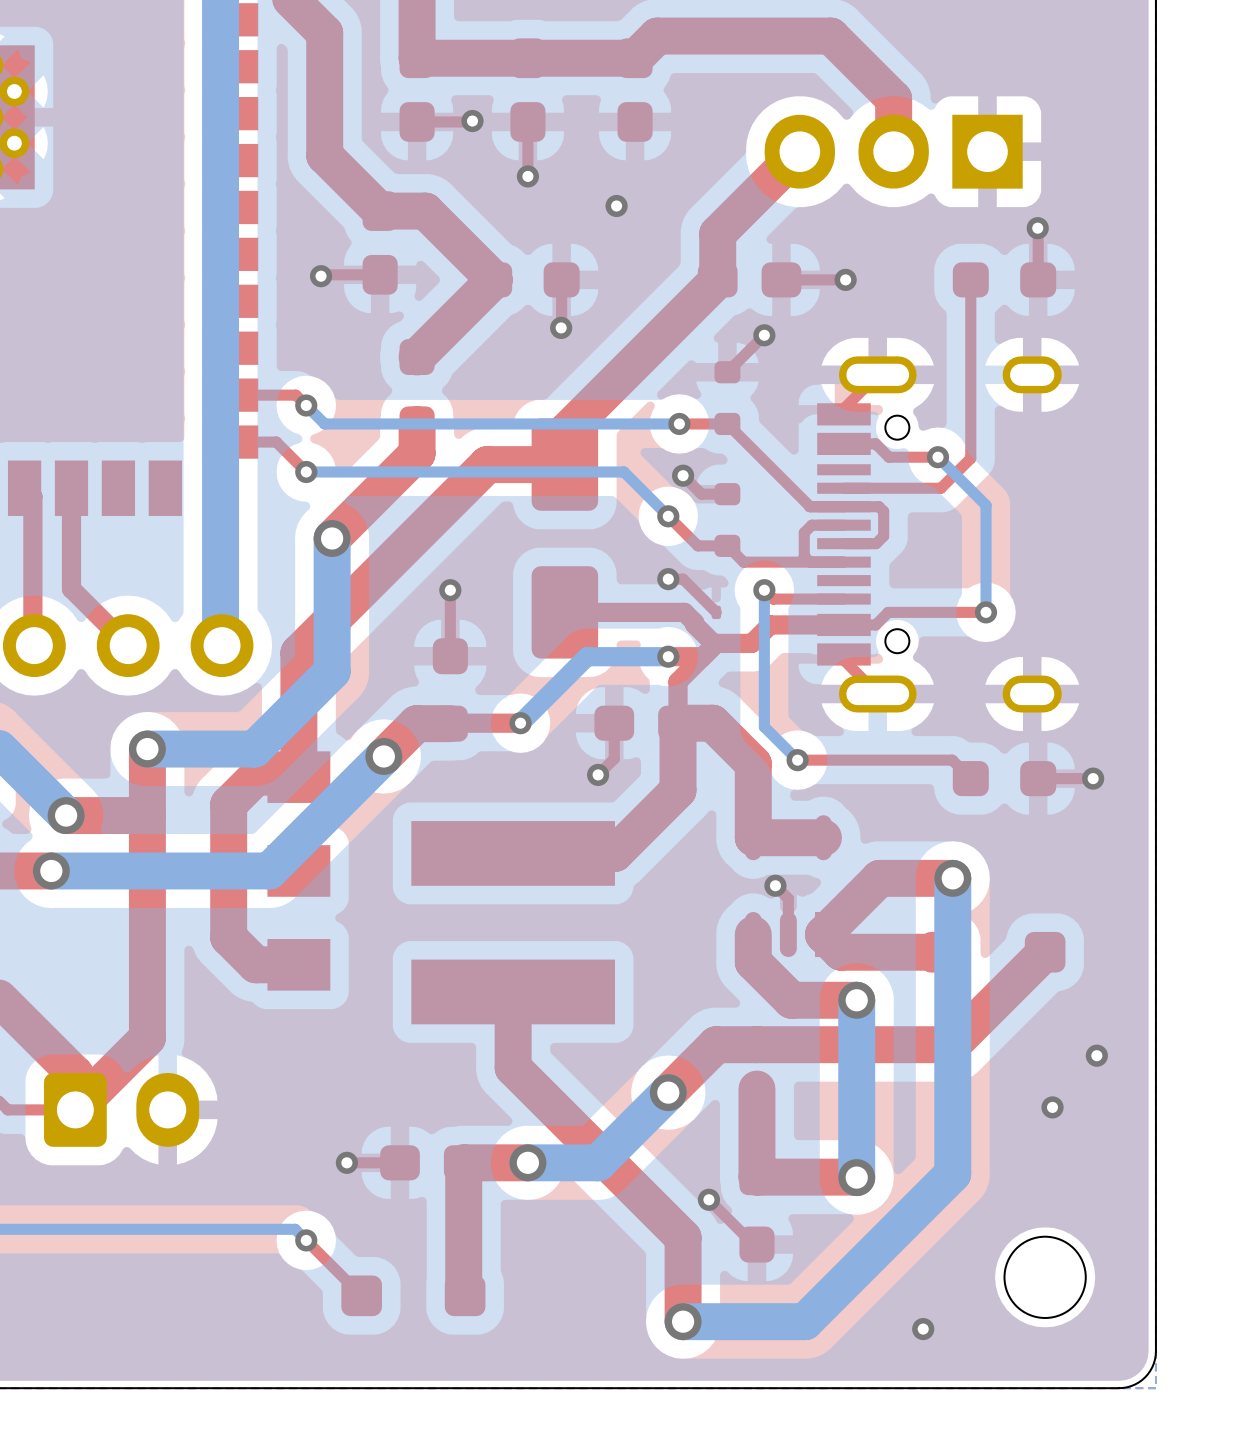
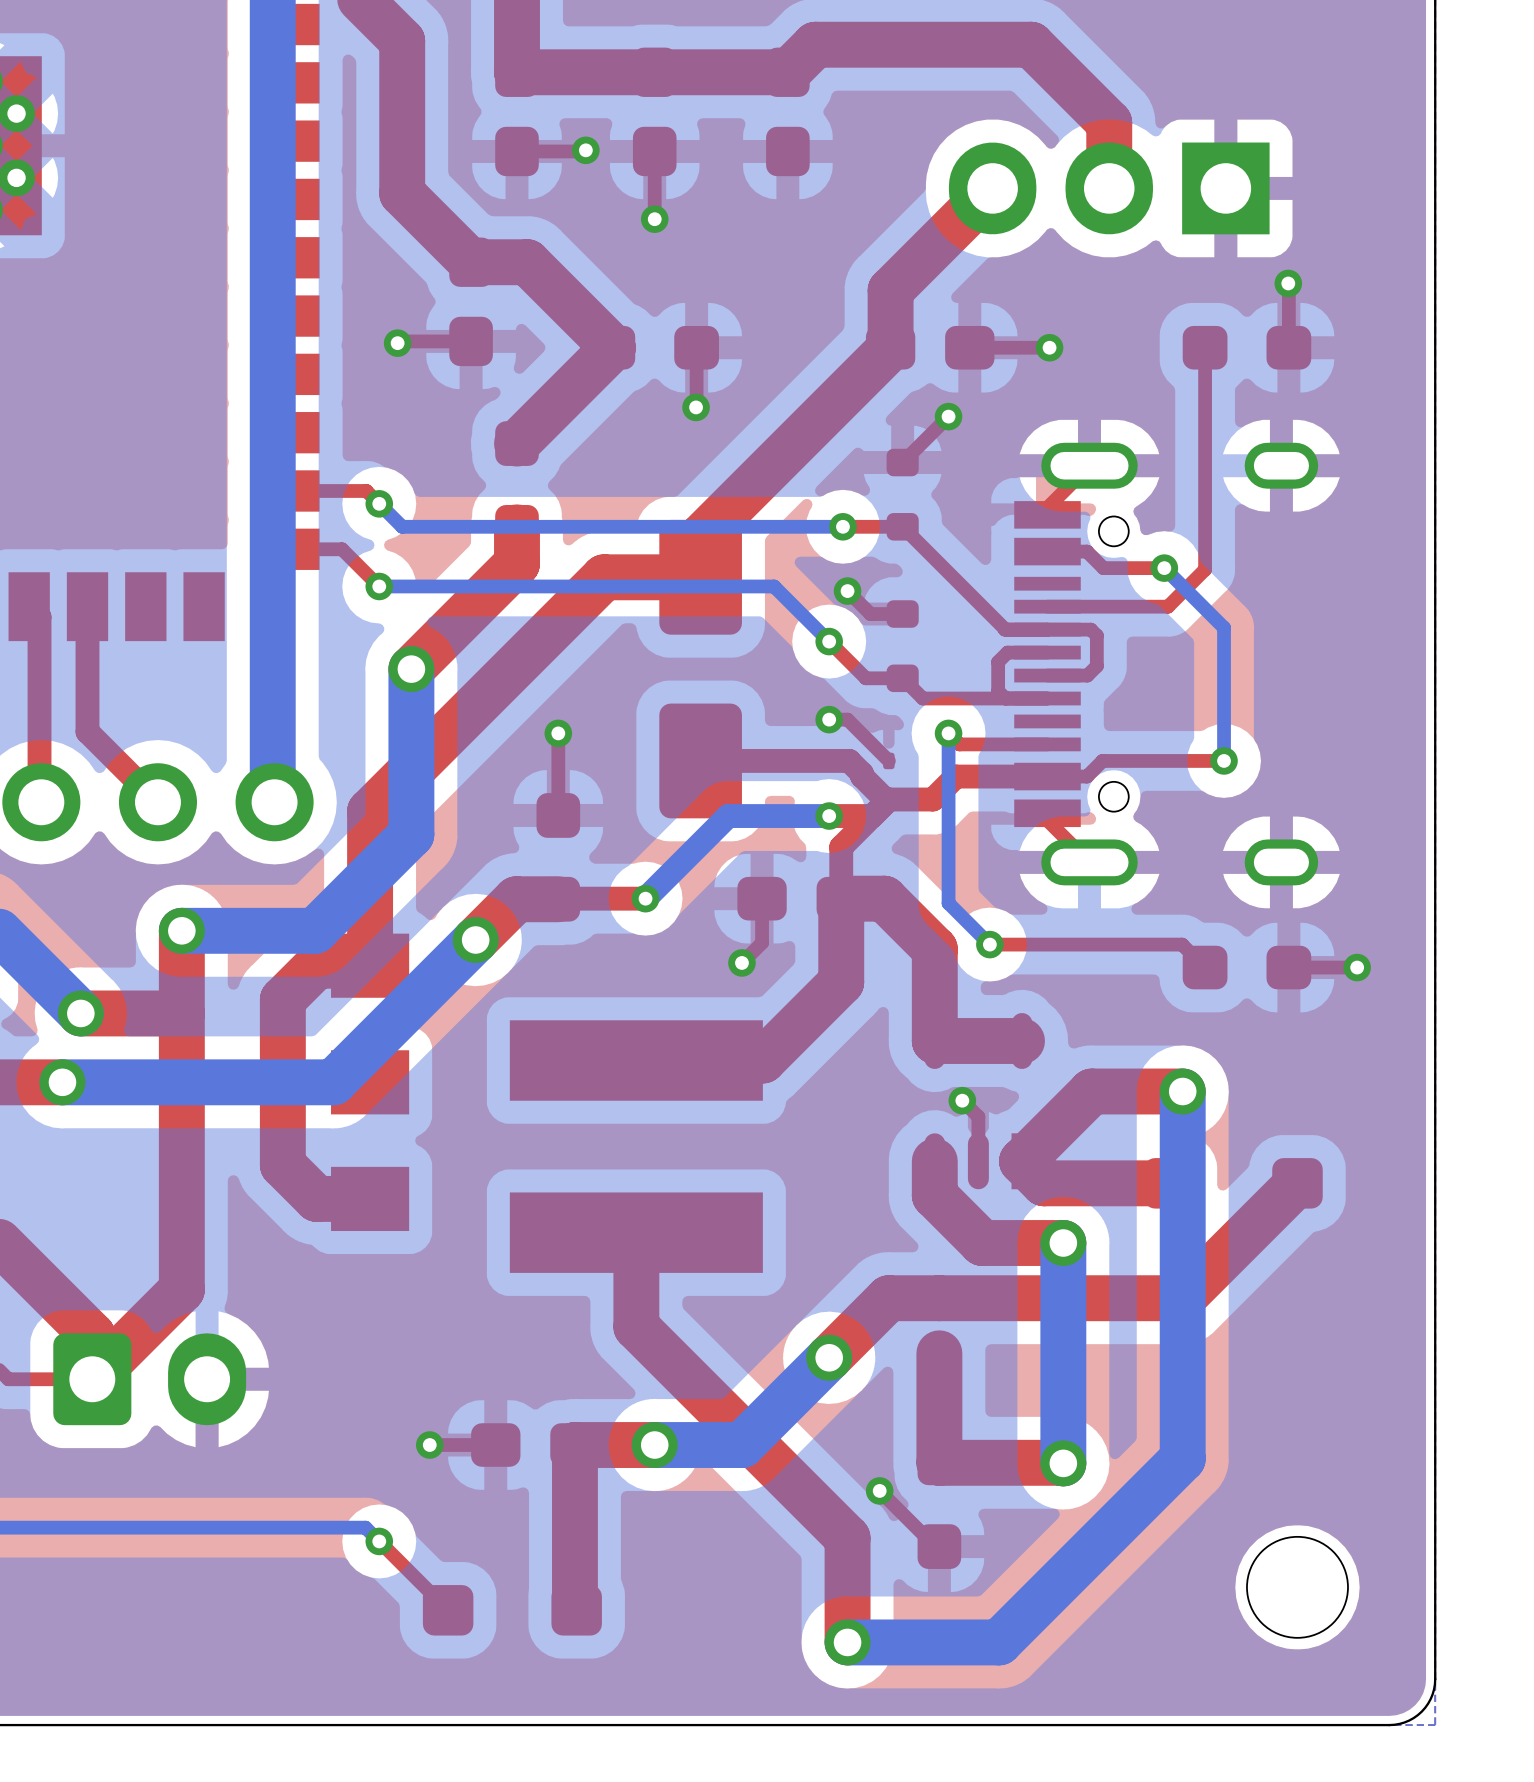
via: (616, 206) -> none
via: (1096, 1055) -> none
via: (1052, 1107) -> none
via: (923, 1329) -> none

